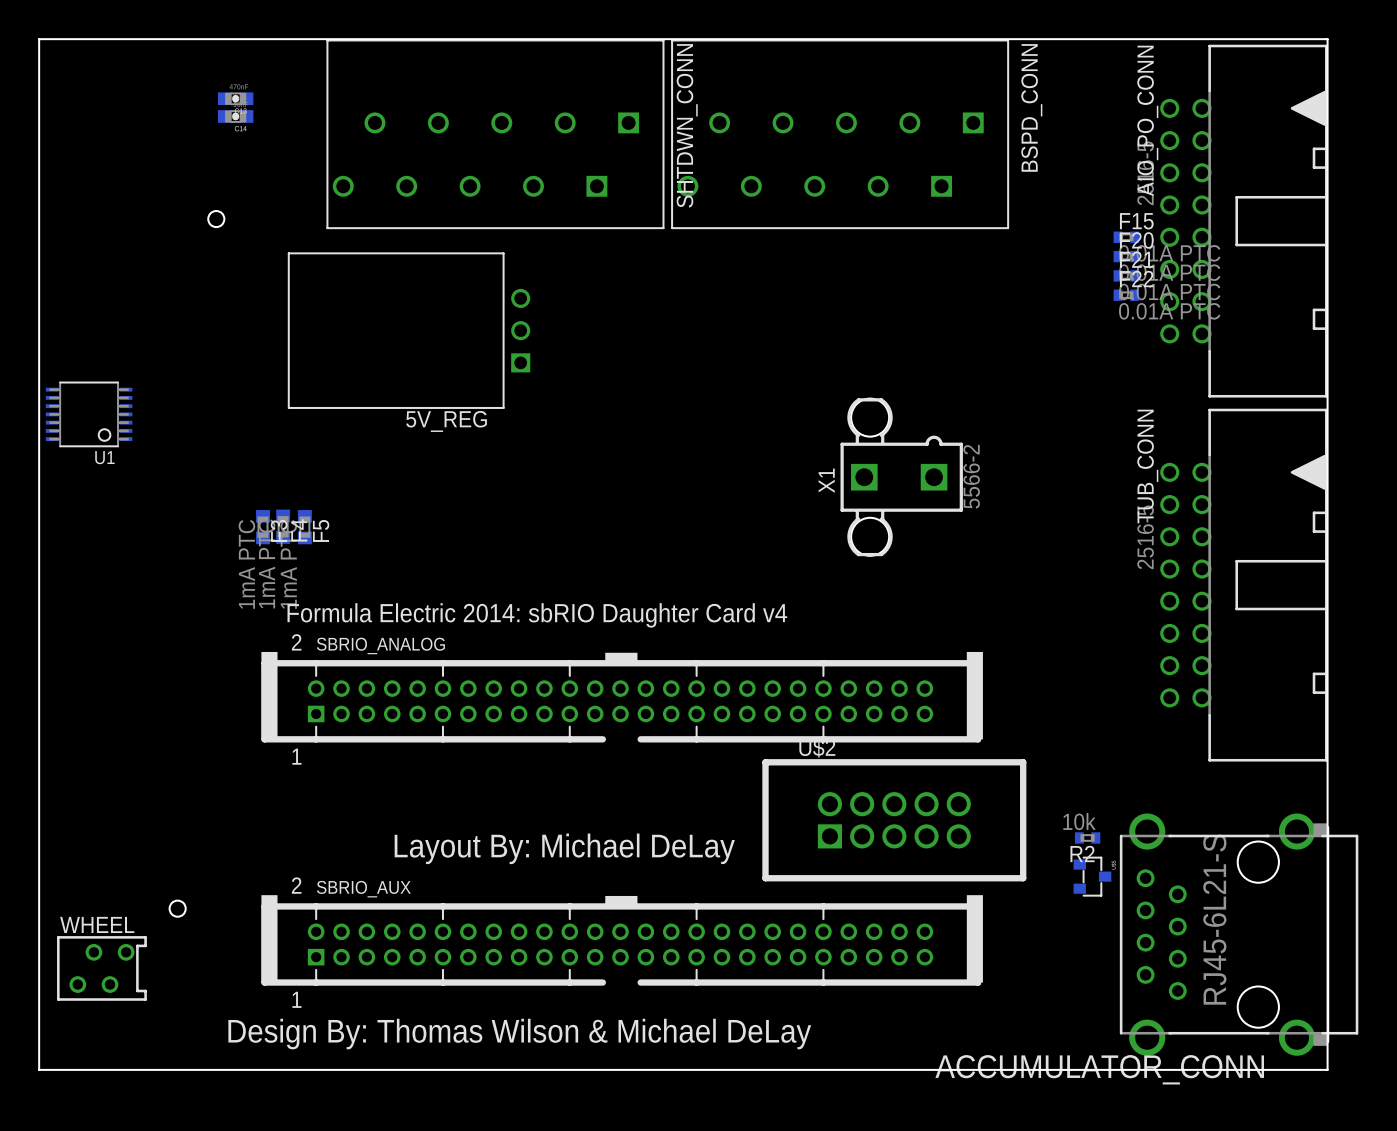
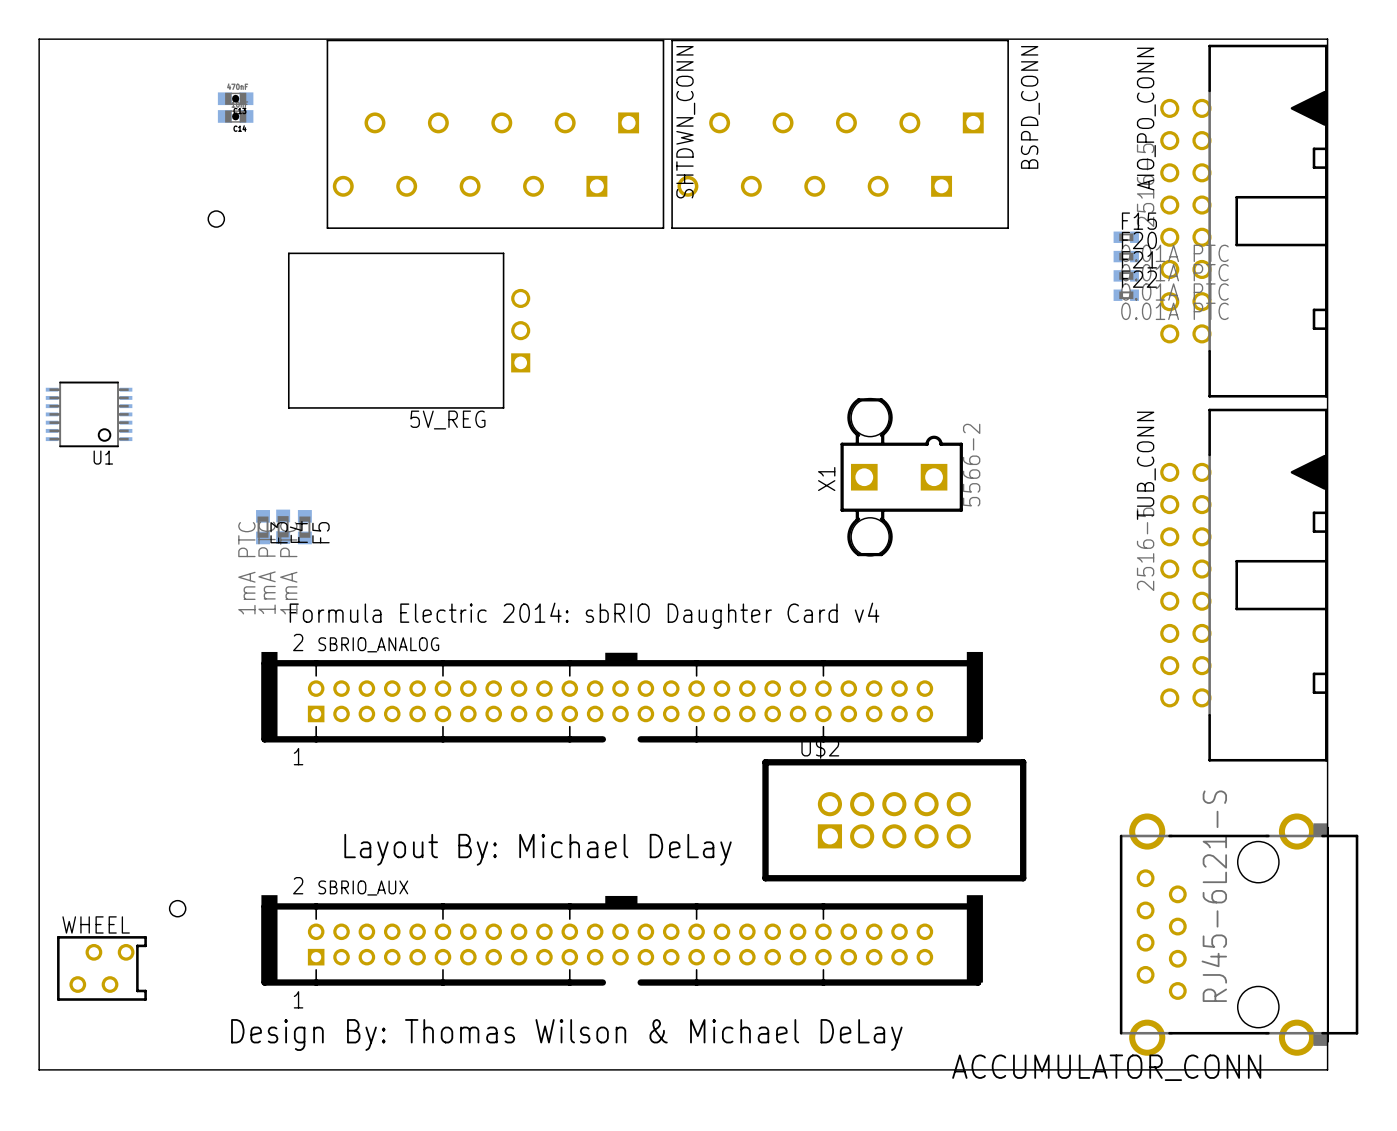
R2: 10k (1087, 837) -> none
part: (1092, 876) -> none

